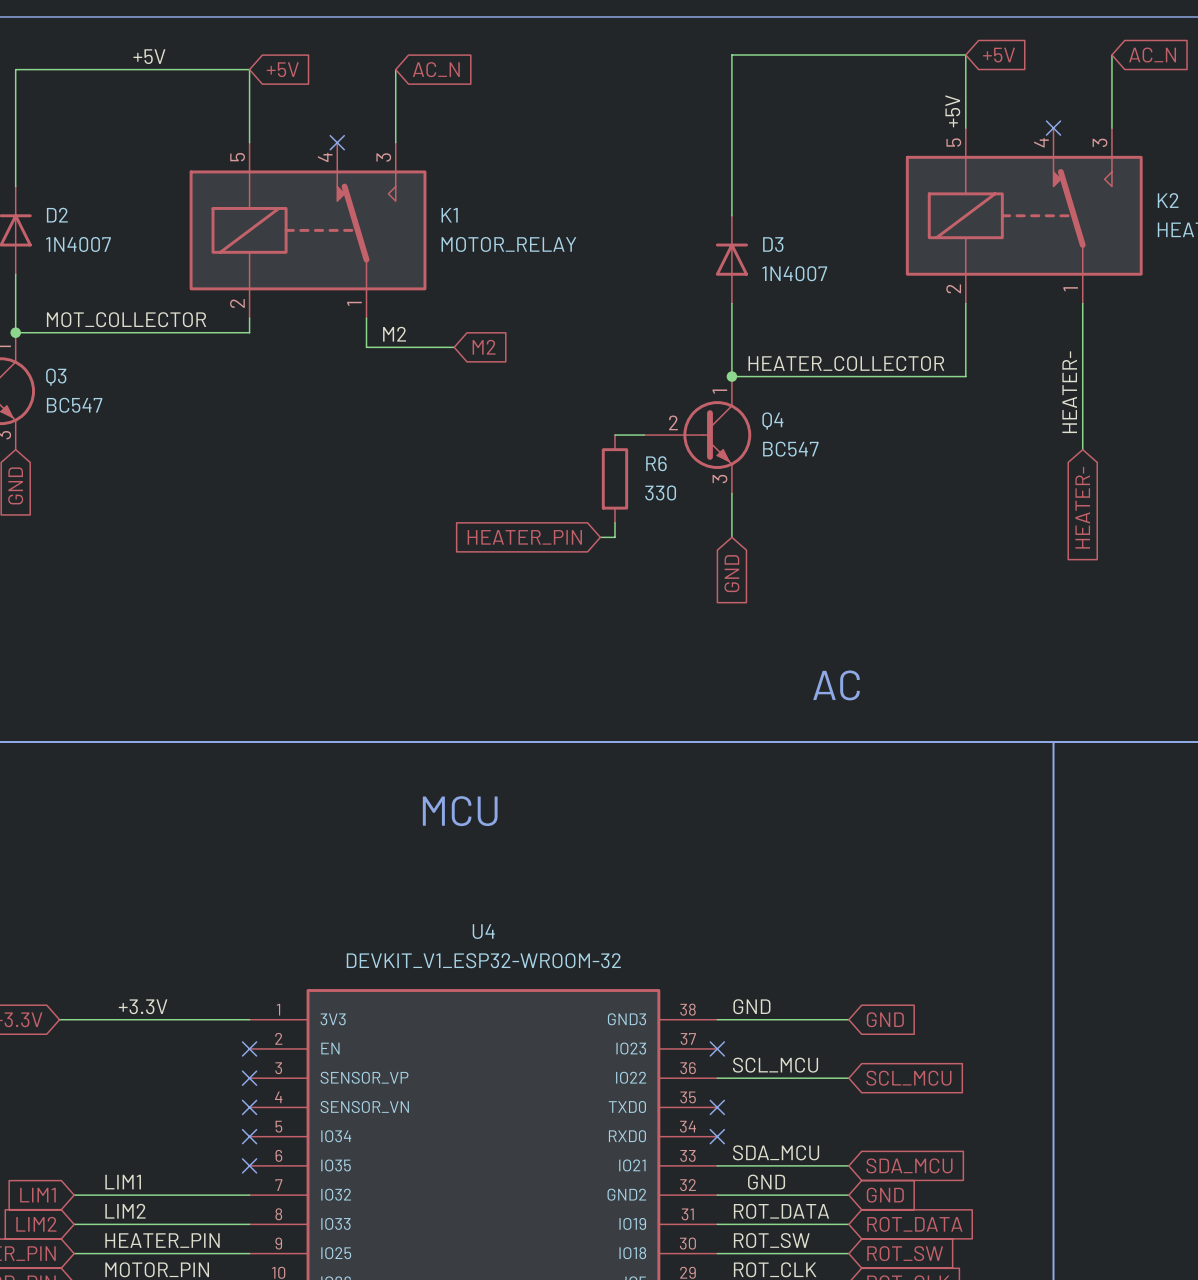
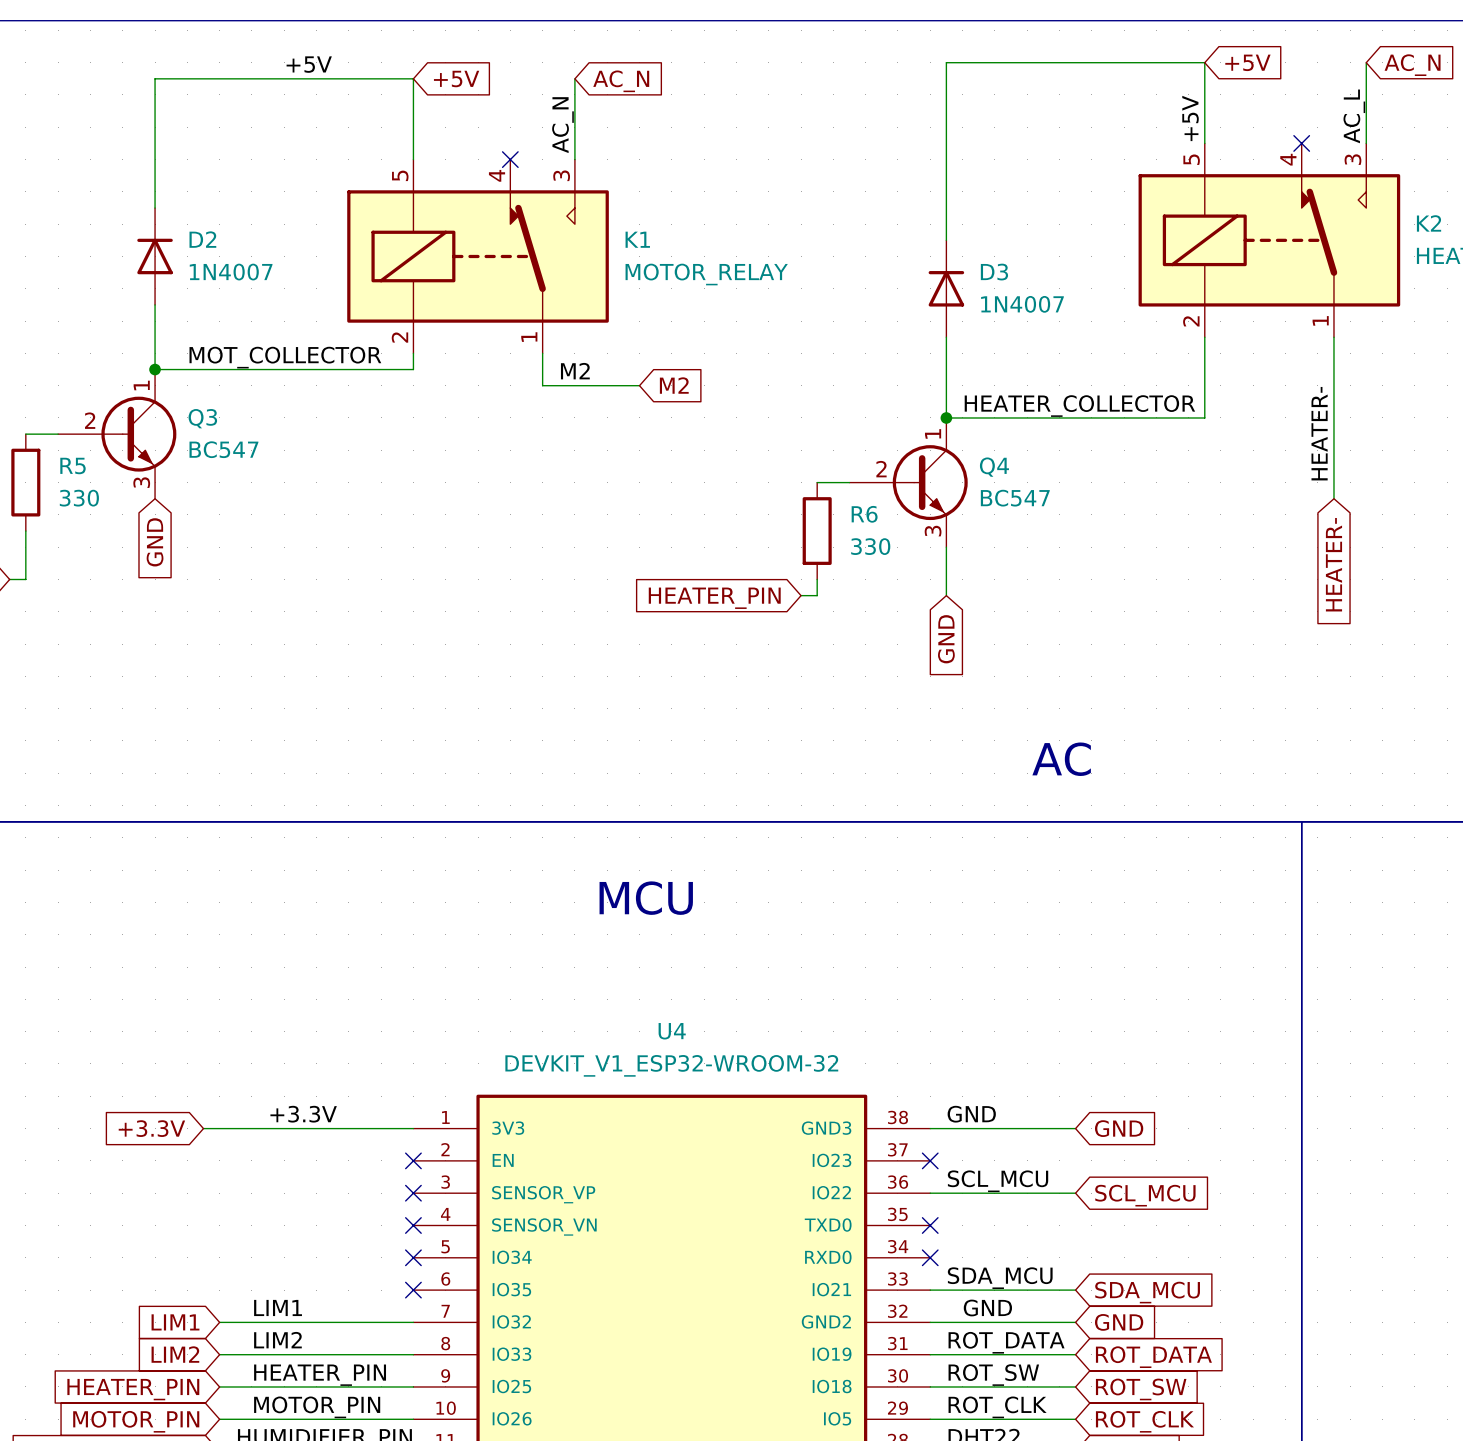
label: none -> AC_L (1354, 116)
label: none -> AC_N (562, 125)

